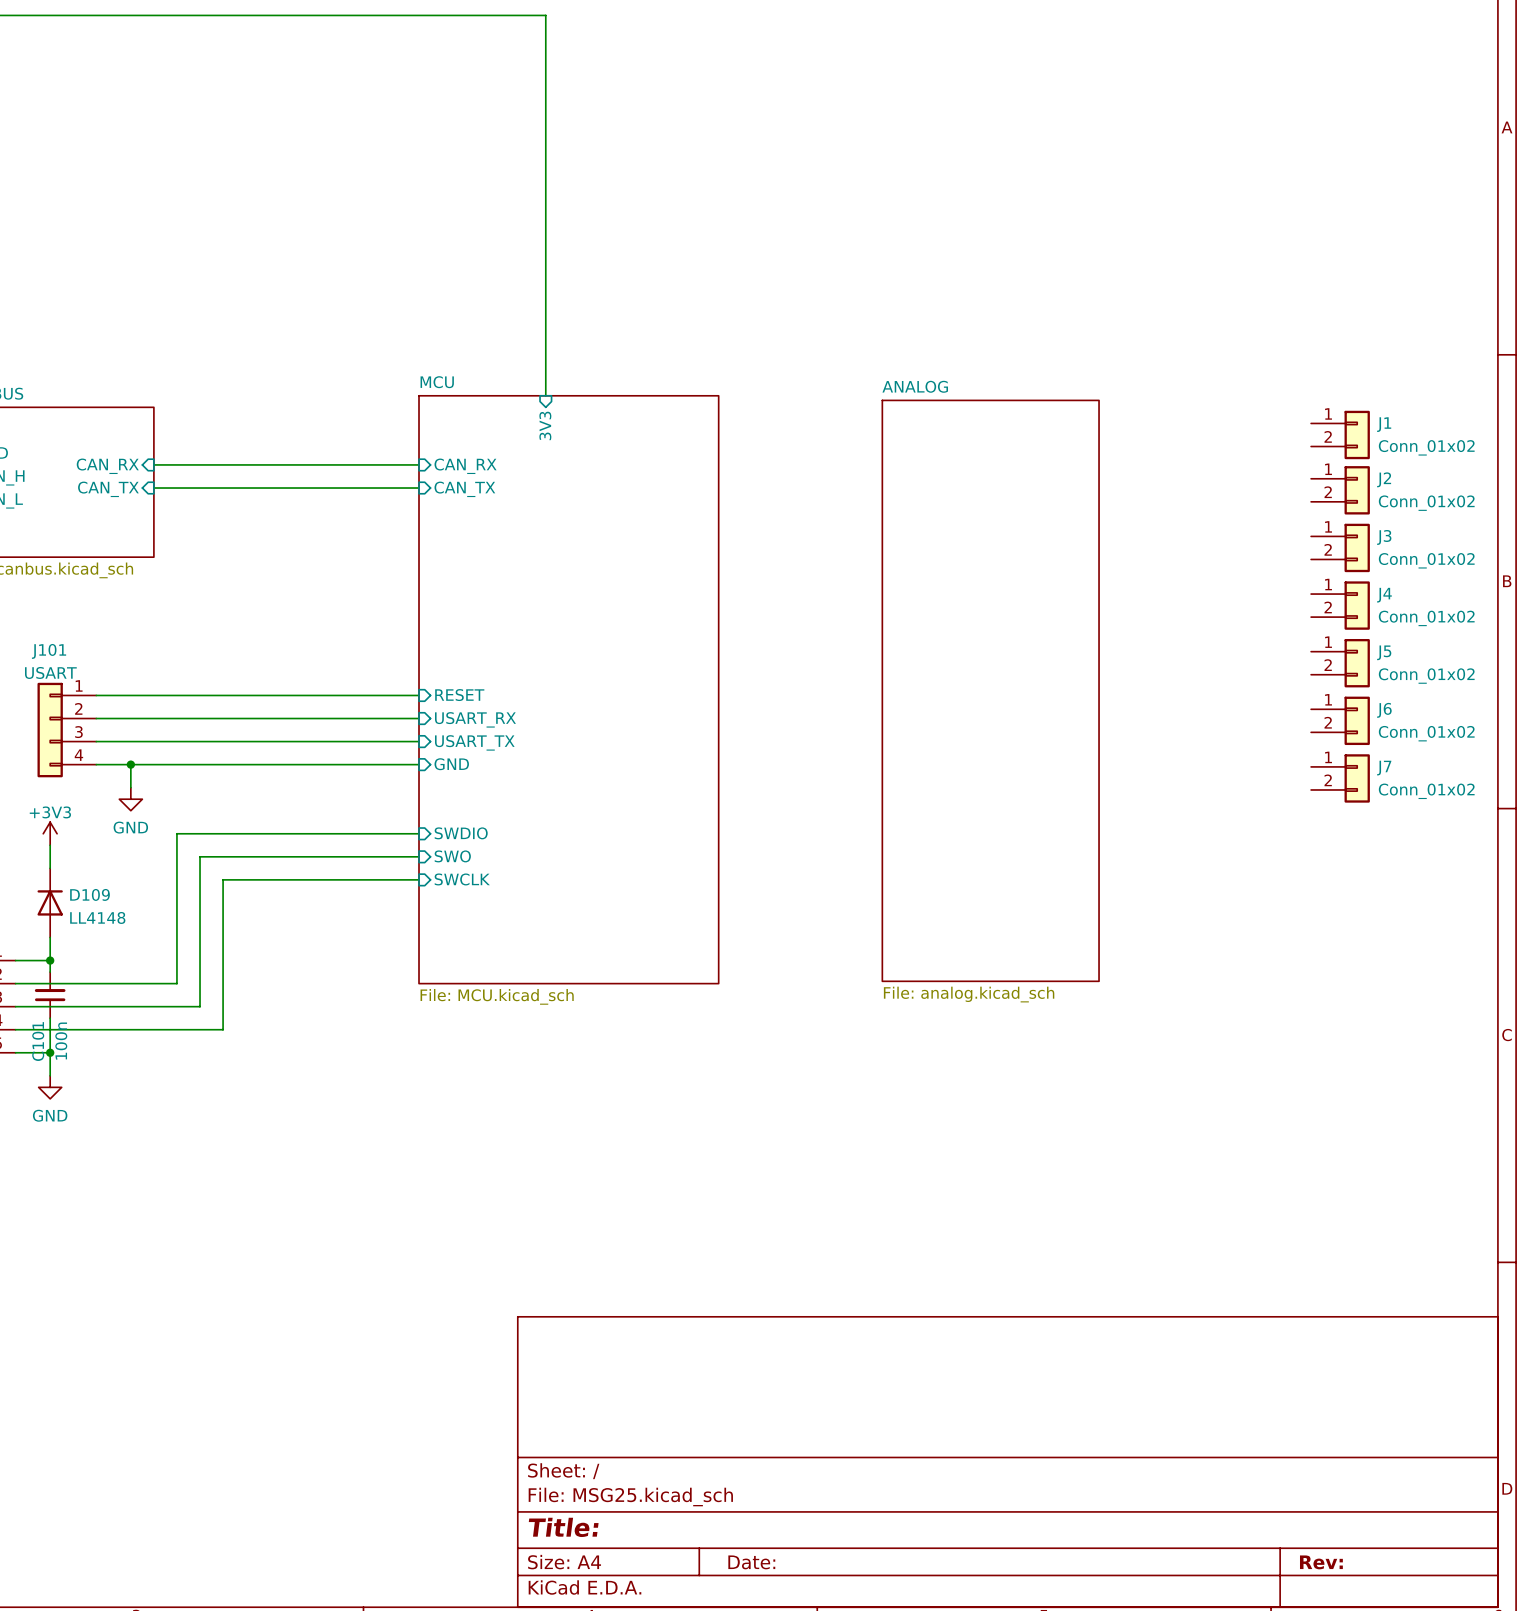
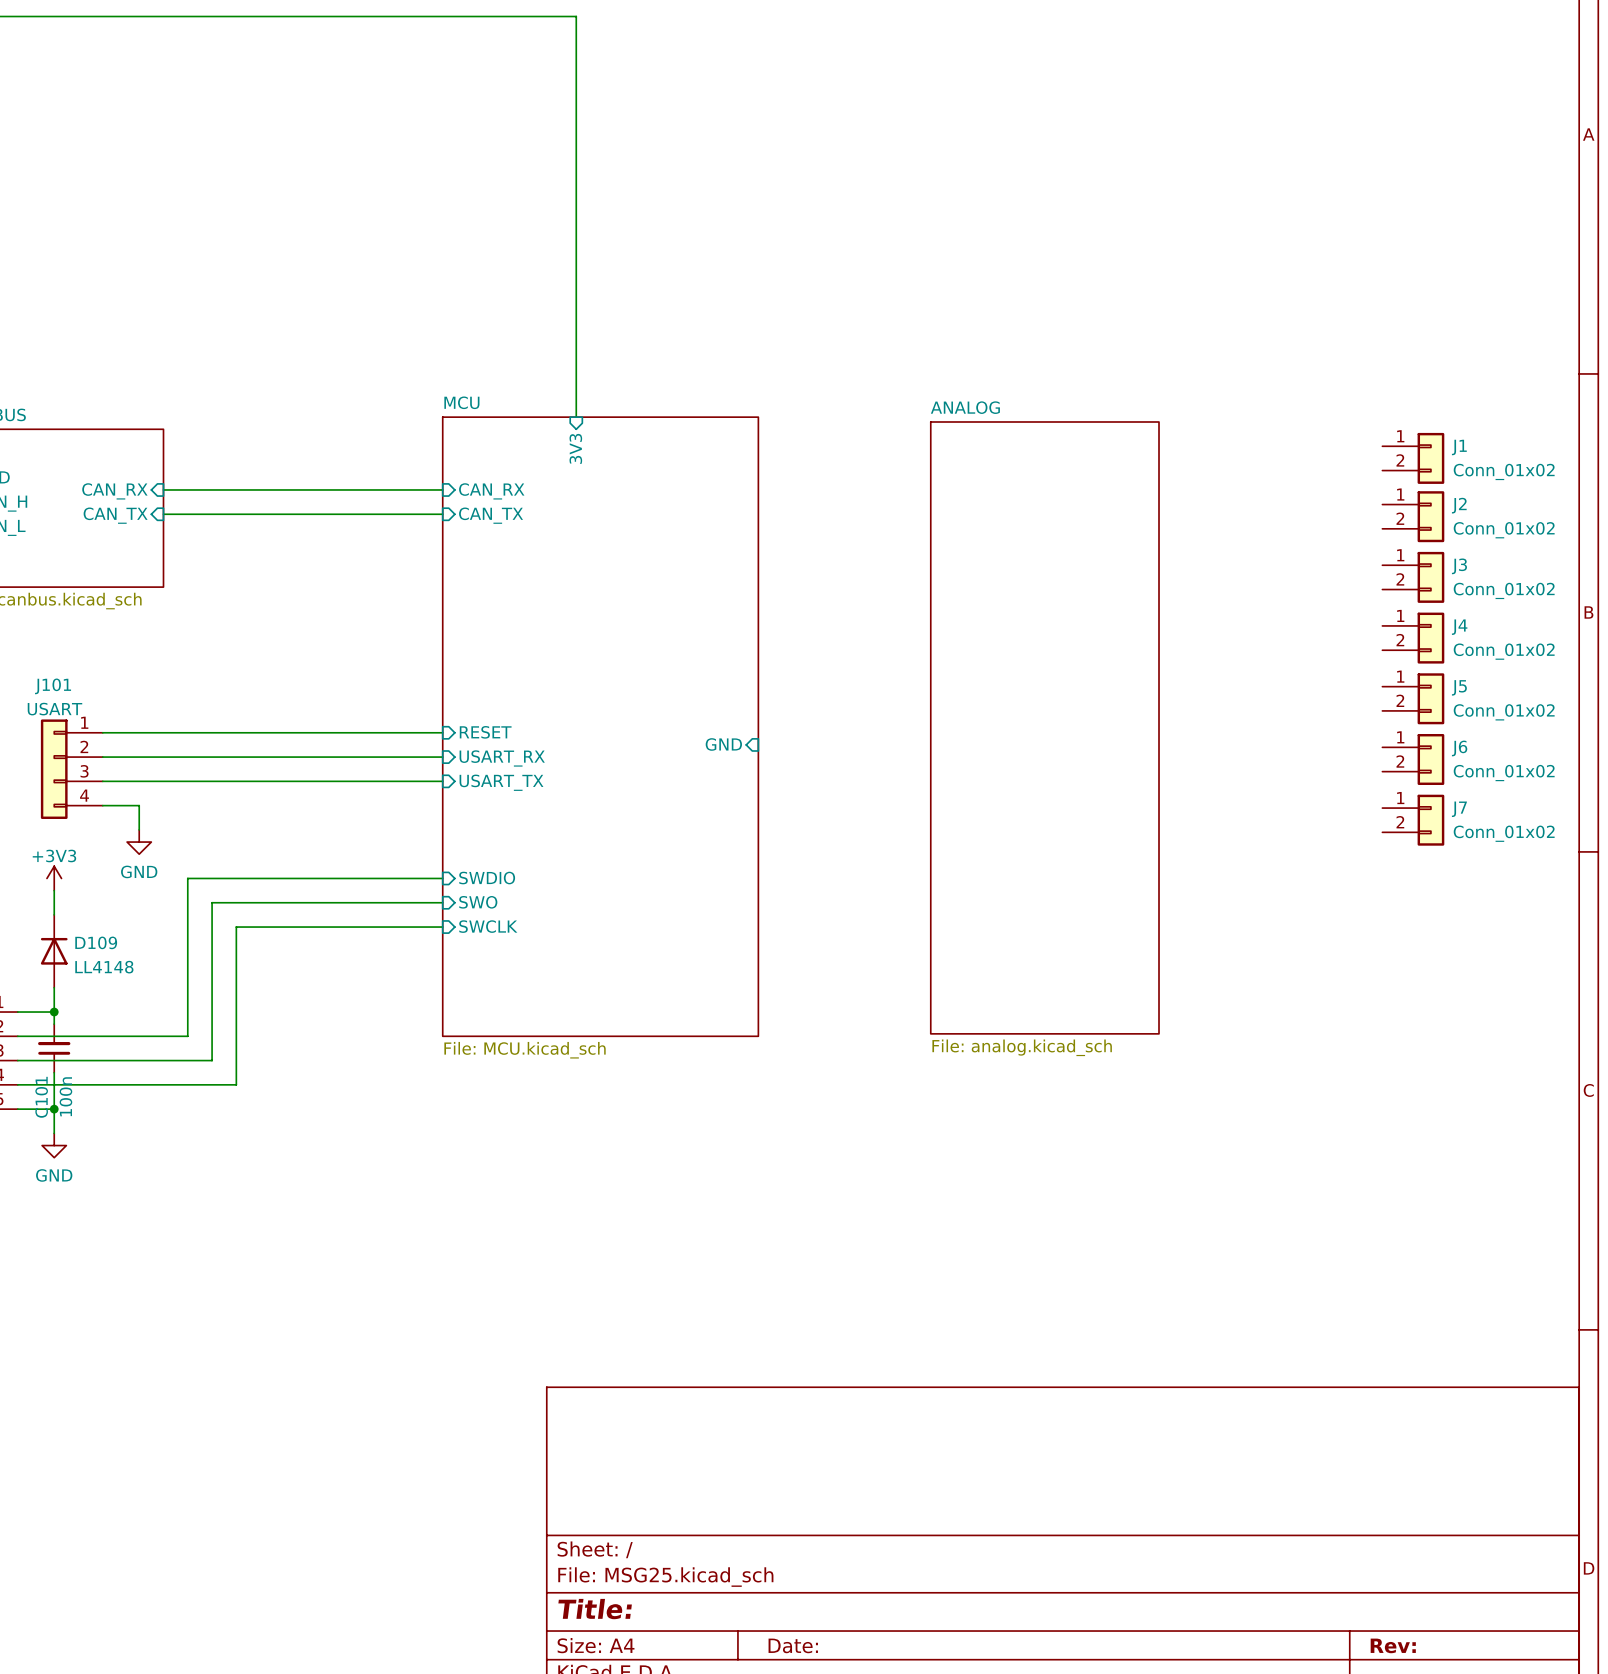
sheet pin: none -> GND (723, 744)
wire: (130, 764) (419, 764) -> none
junction: (130, 764) -> none
sheet pin: GND (451, 764) -> none

